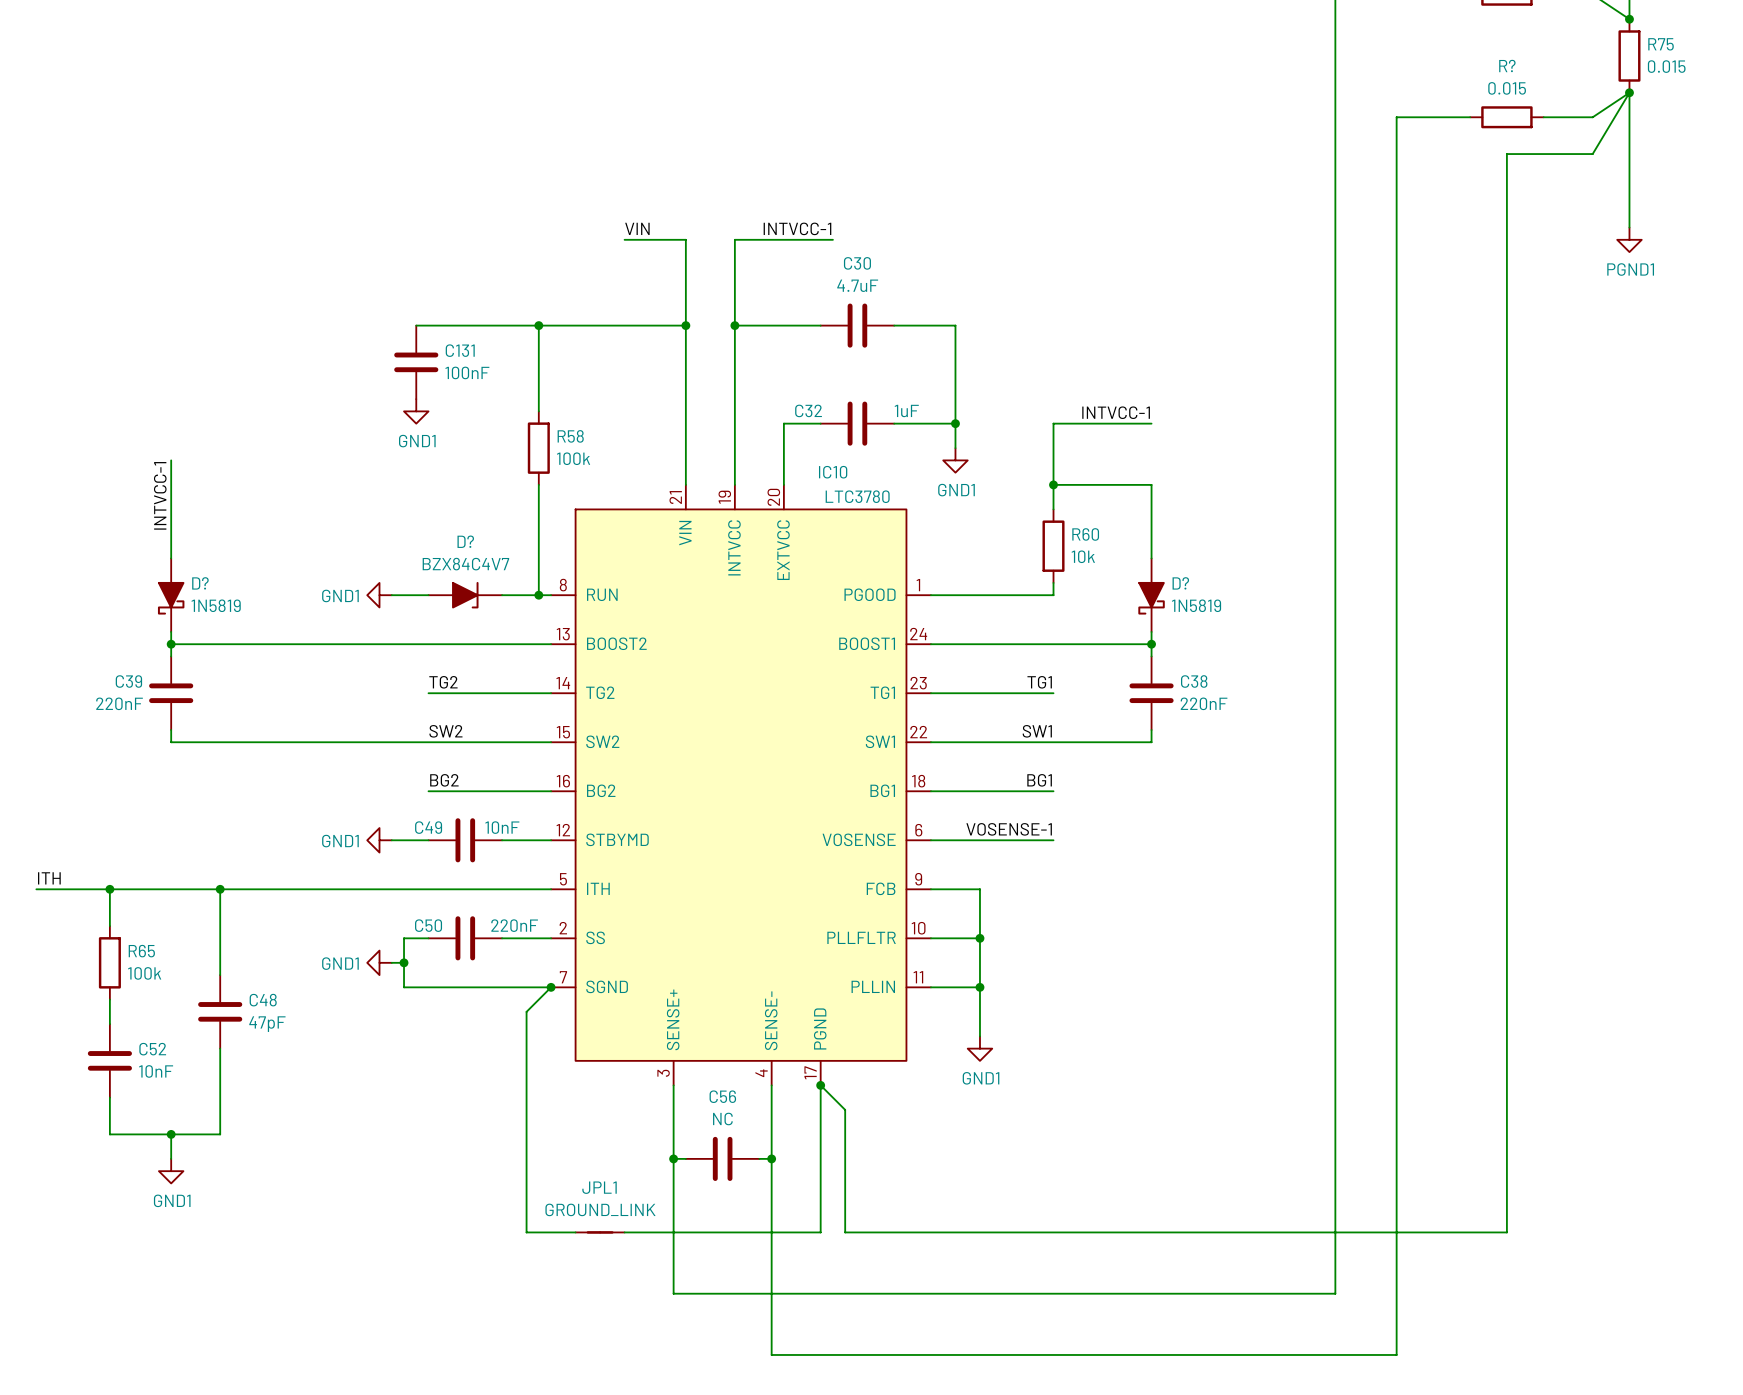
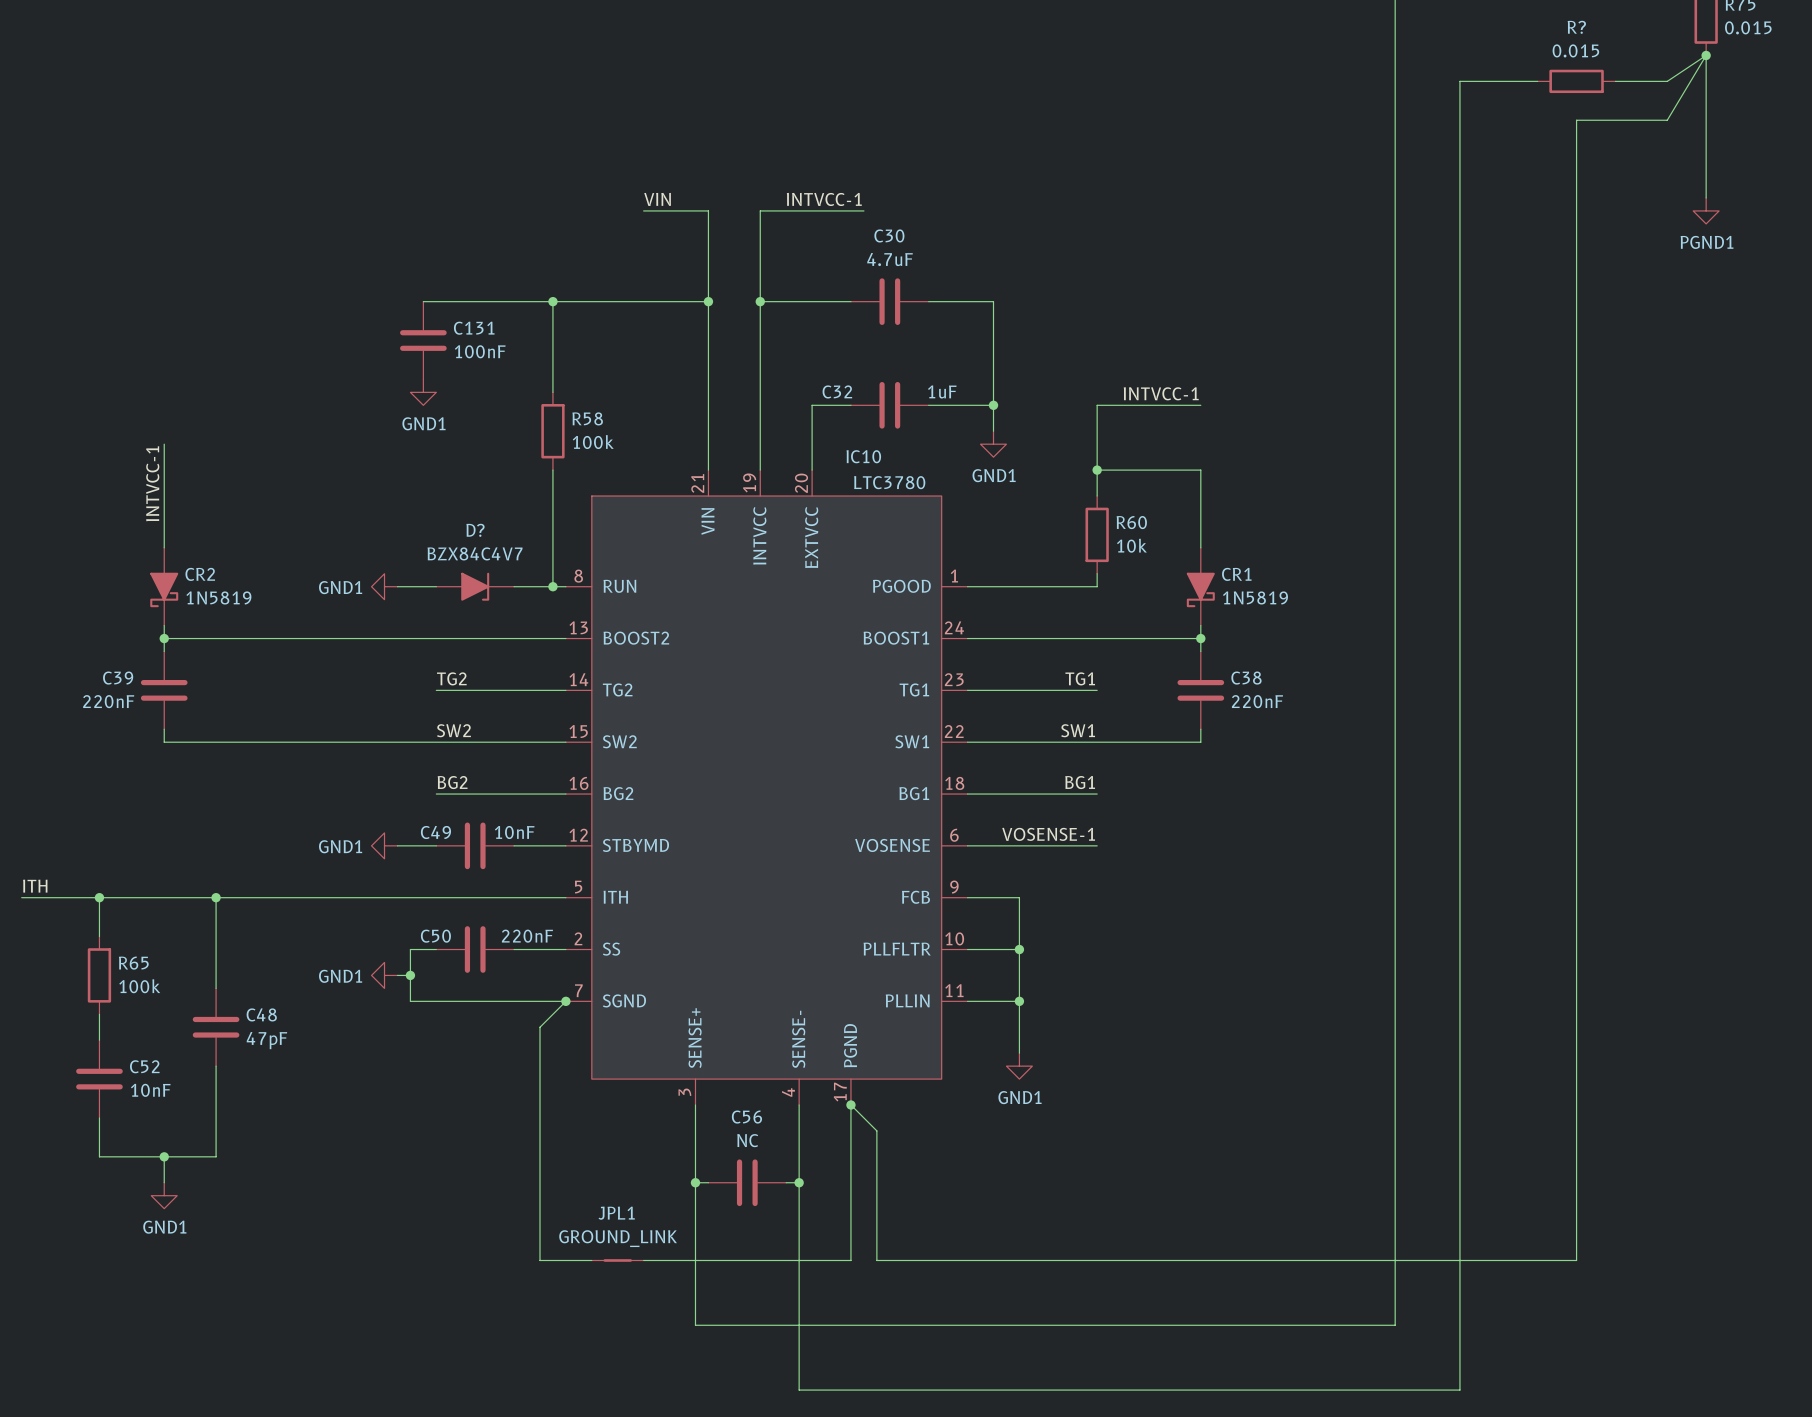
D? name: D? (200, 583) -> CR2 (200, 574)
D? name: D? (1180, 583) -> CR1 (1236, 574)

